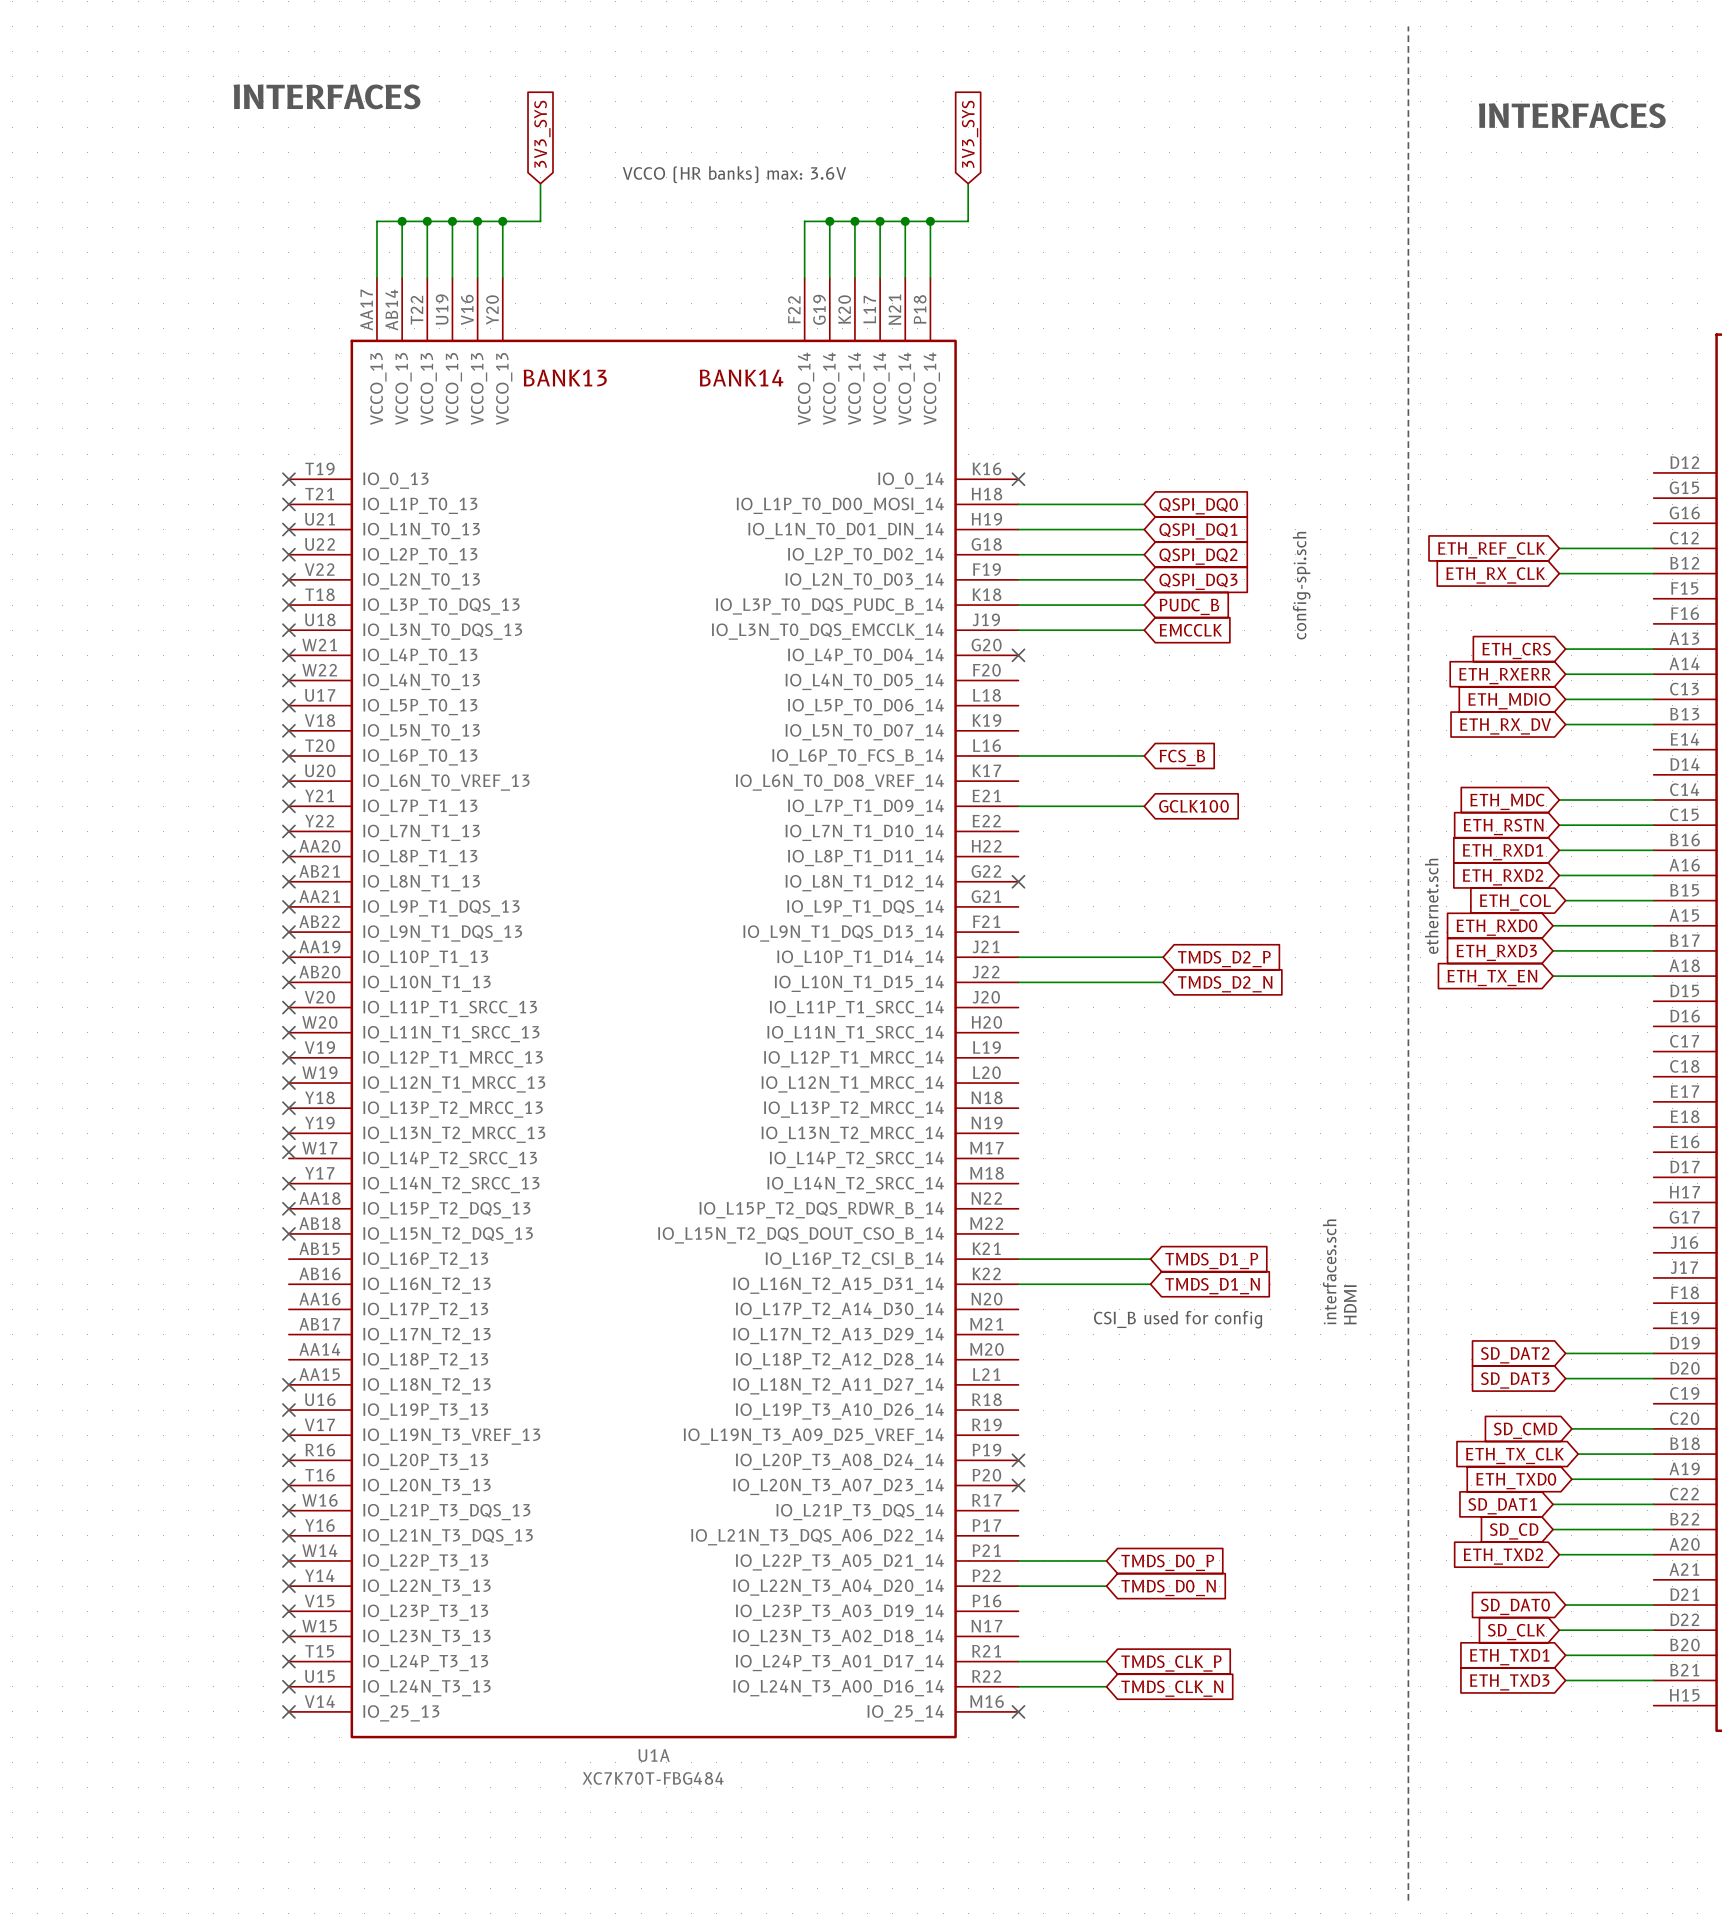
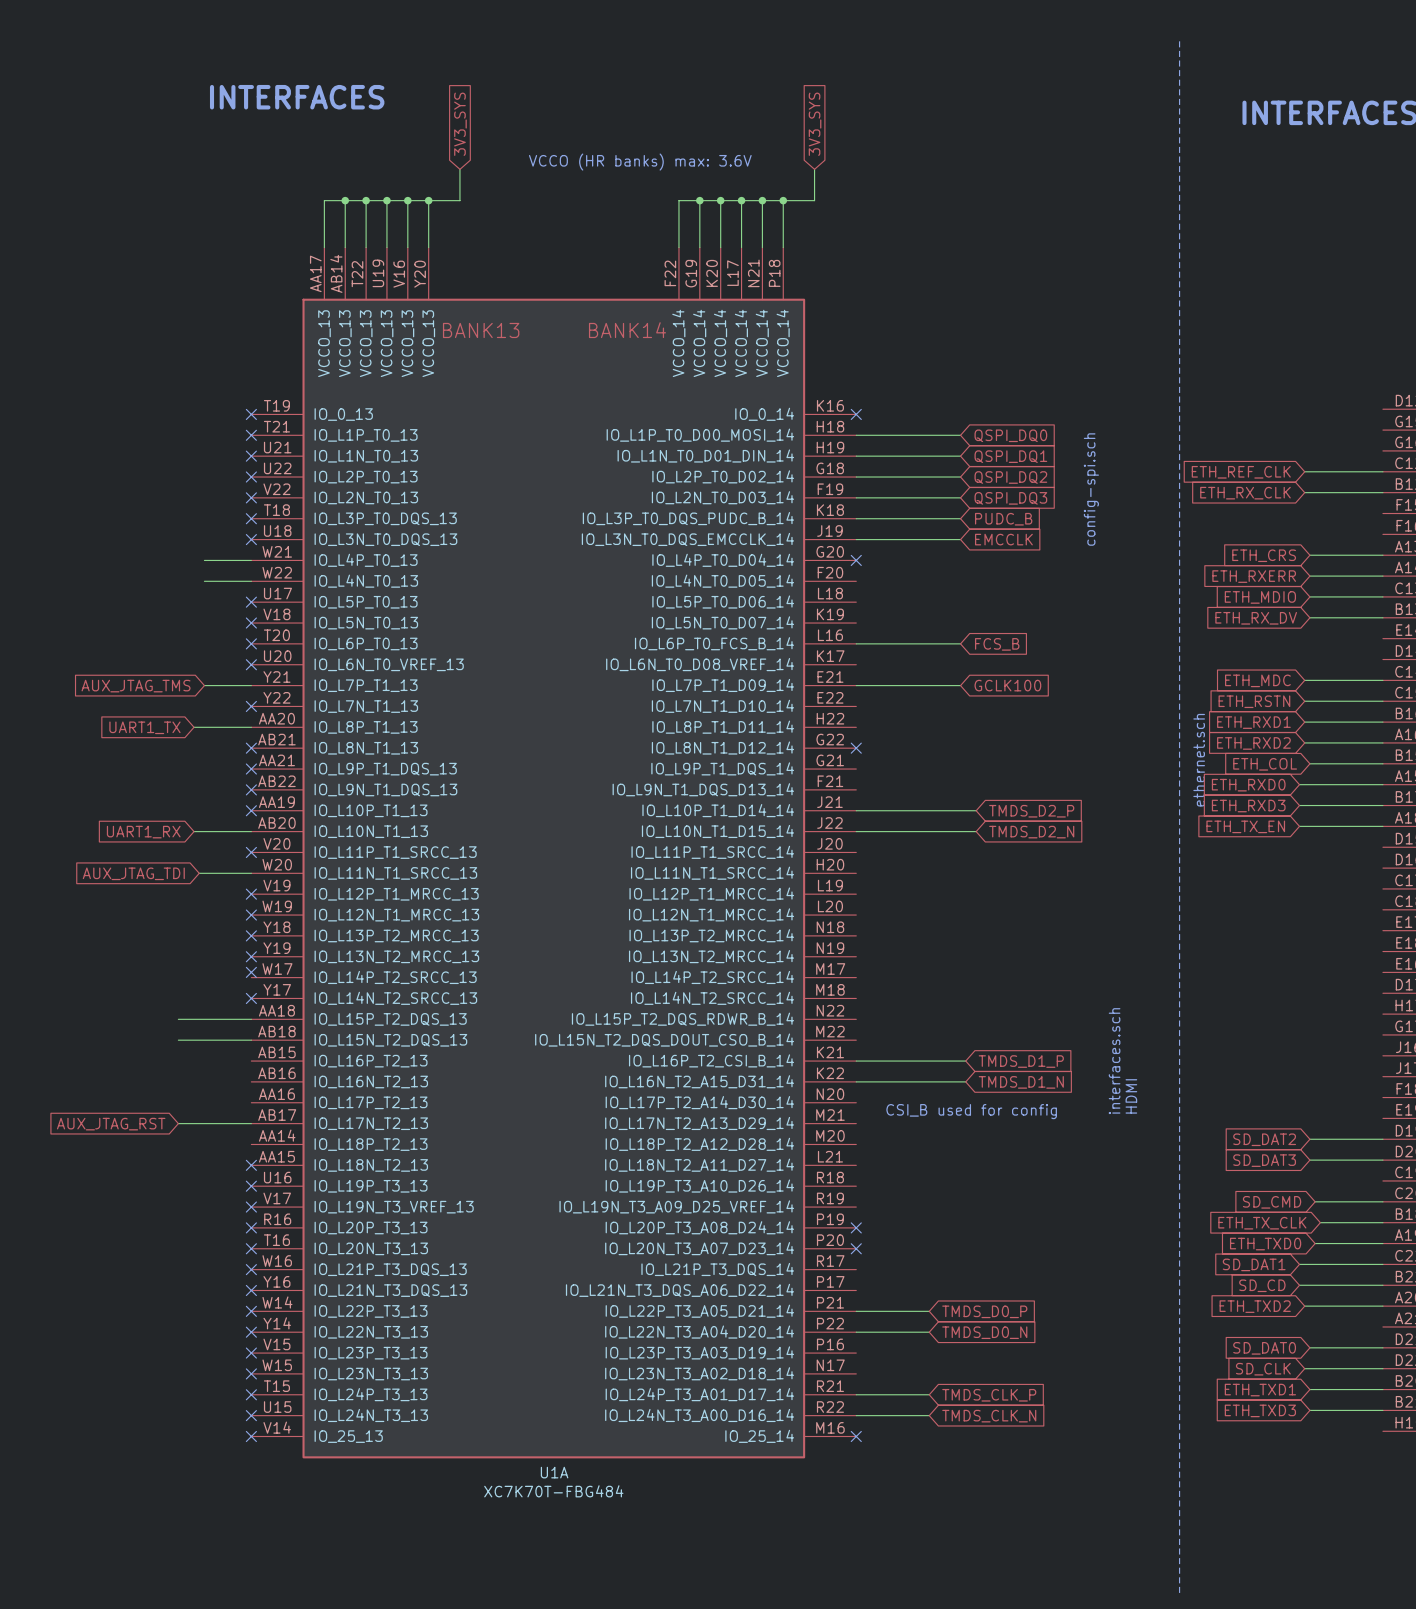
wire: none -> (204, 560) (251, 560)
no-connect mark: (288, 655) -> none
wire: none -> (204, 581) (251, 581)
no-connect mark: (288, 680) -> none
wire: none -> (204, 685) (251, 685)
no-connect mark: (288, 806) -> none
global label: none -> AUX_JTAG_TMS (136, 686)
wire: none -> (194, 727) (251, 727)
no-connect mark: (288, 856) -> none
global label: none -> UART1_TX (144, 727)
wire: none -> (194, 831) (251, 831)
no-connect mark: (288, 982) -> none
global label: none -> UART1_RX (143, 832)
wire: none -> (199, 873) (251, 873)
no-connect mark: (288, 1032) -> none
global label: none -> AUX_JTAG_TDI (133, 873)
wire: none -> (178, 1019) (251, 1019)
no-connect mark: (288, 1208) -> none
wire: none -> (178, 1040) (251, 1040)
no-connect mark: (288, 1233) -> none
wire: none -> (178, 1123) (251, 1123)
global label: none -> AUX_JTAG_RST (111, 1124)

